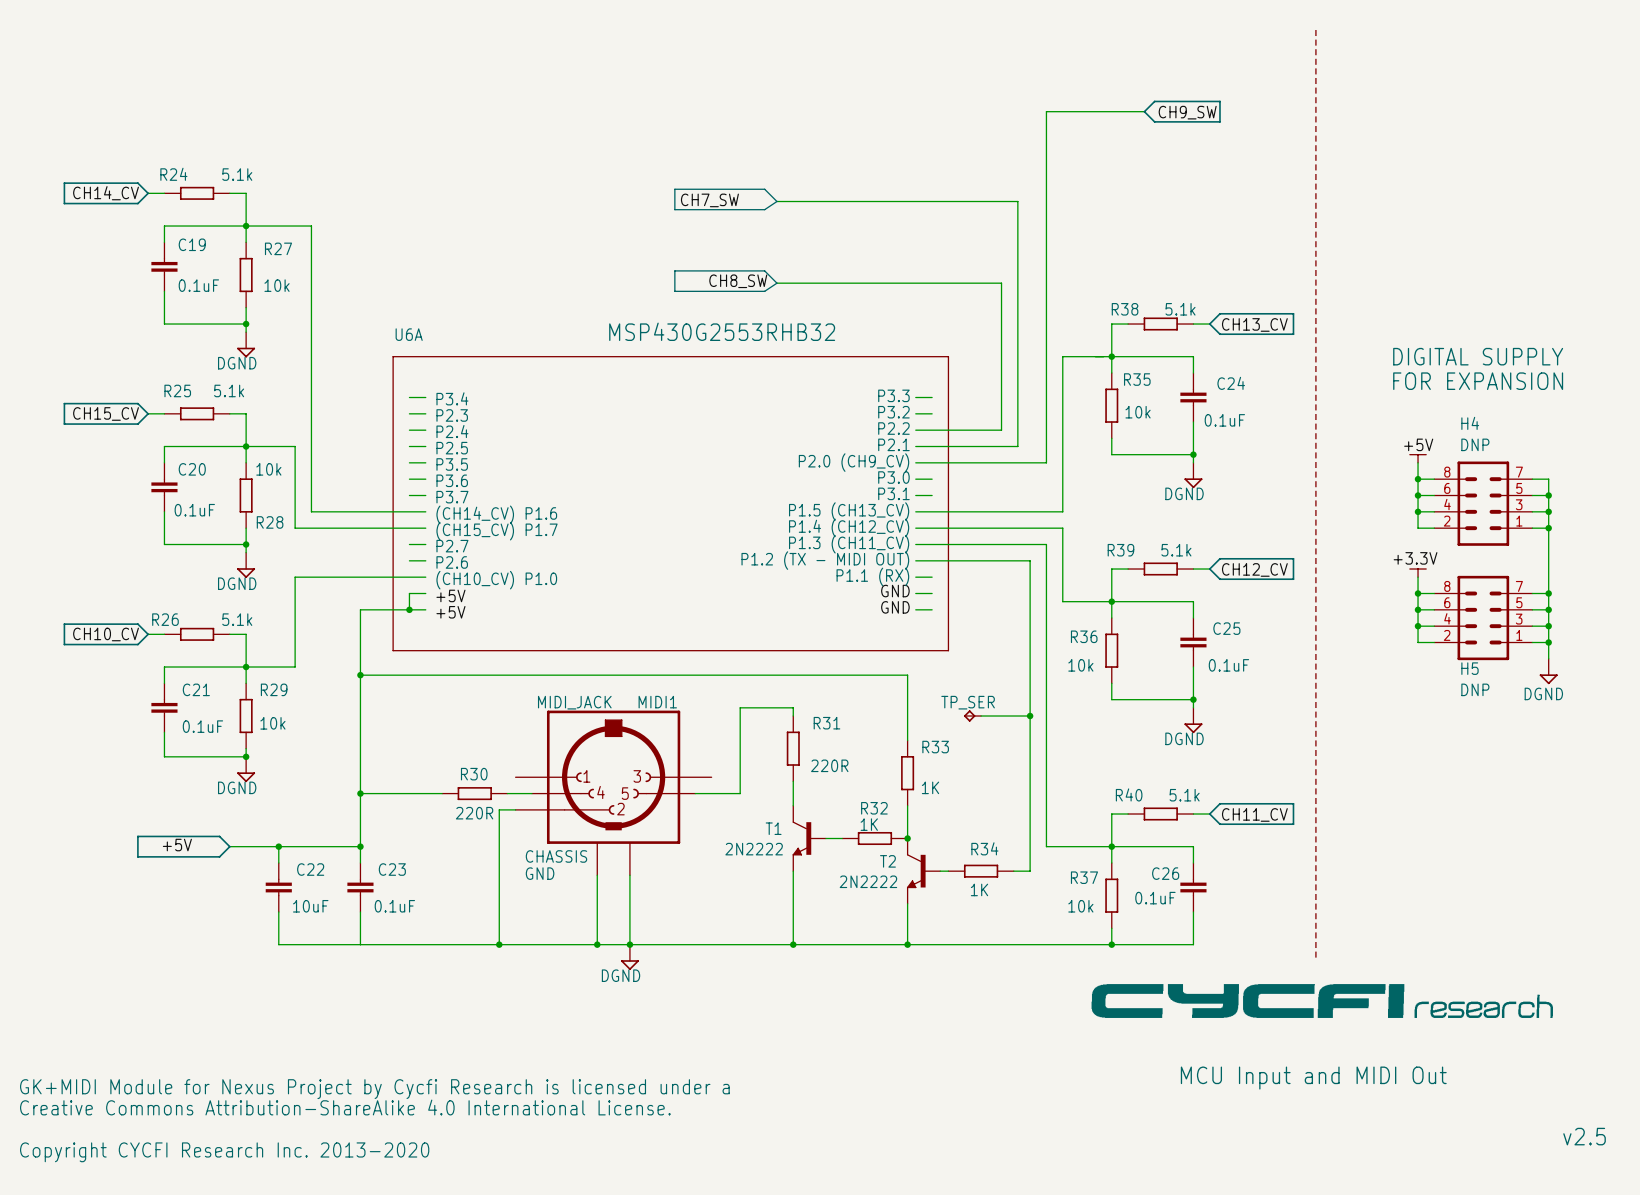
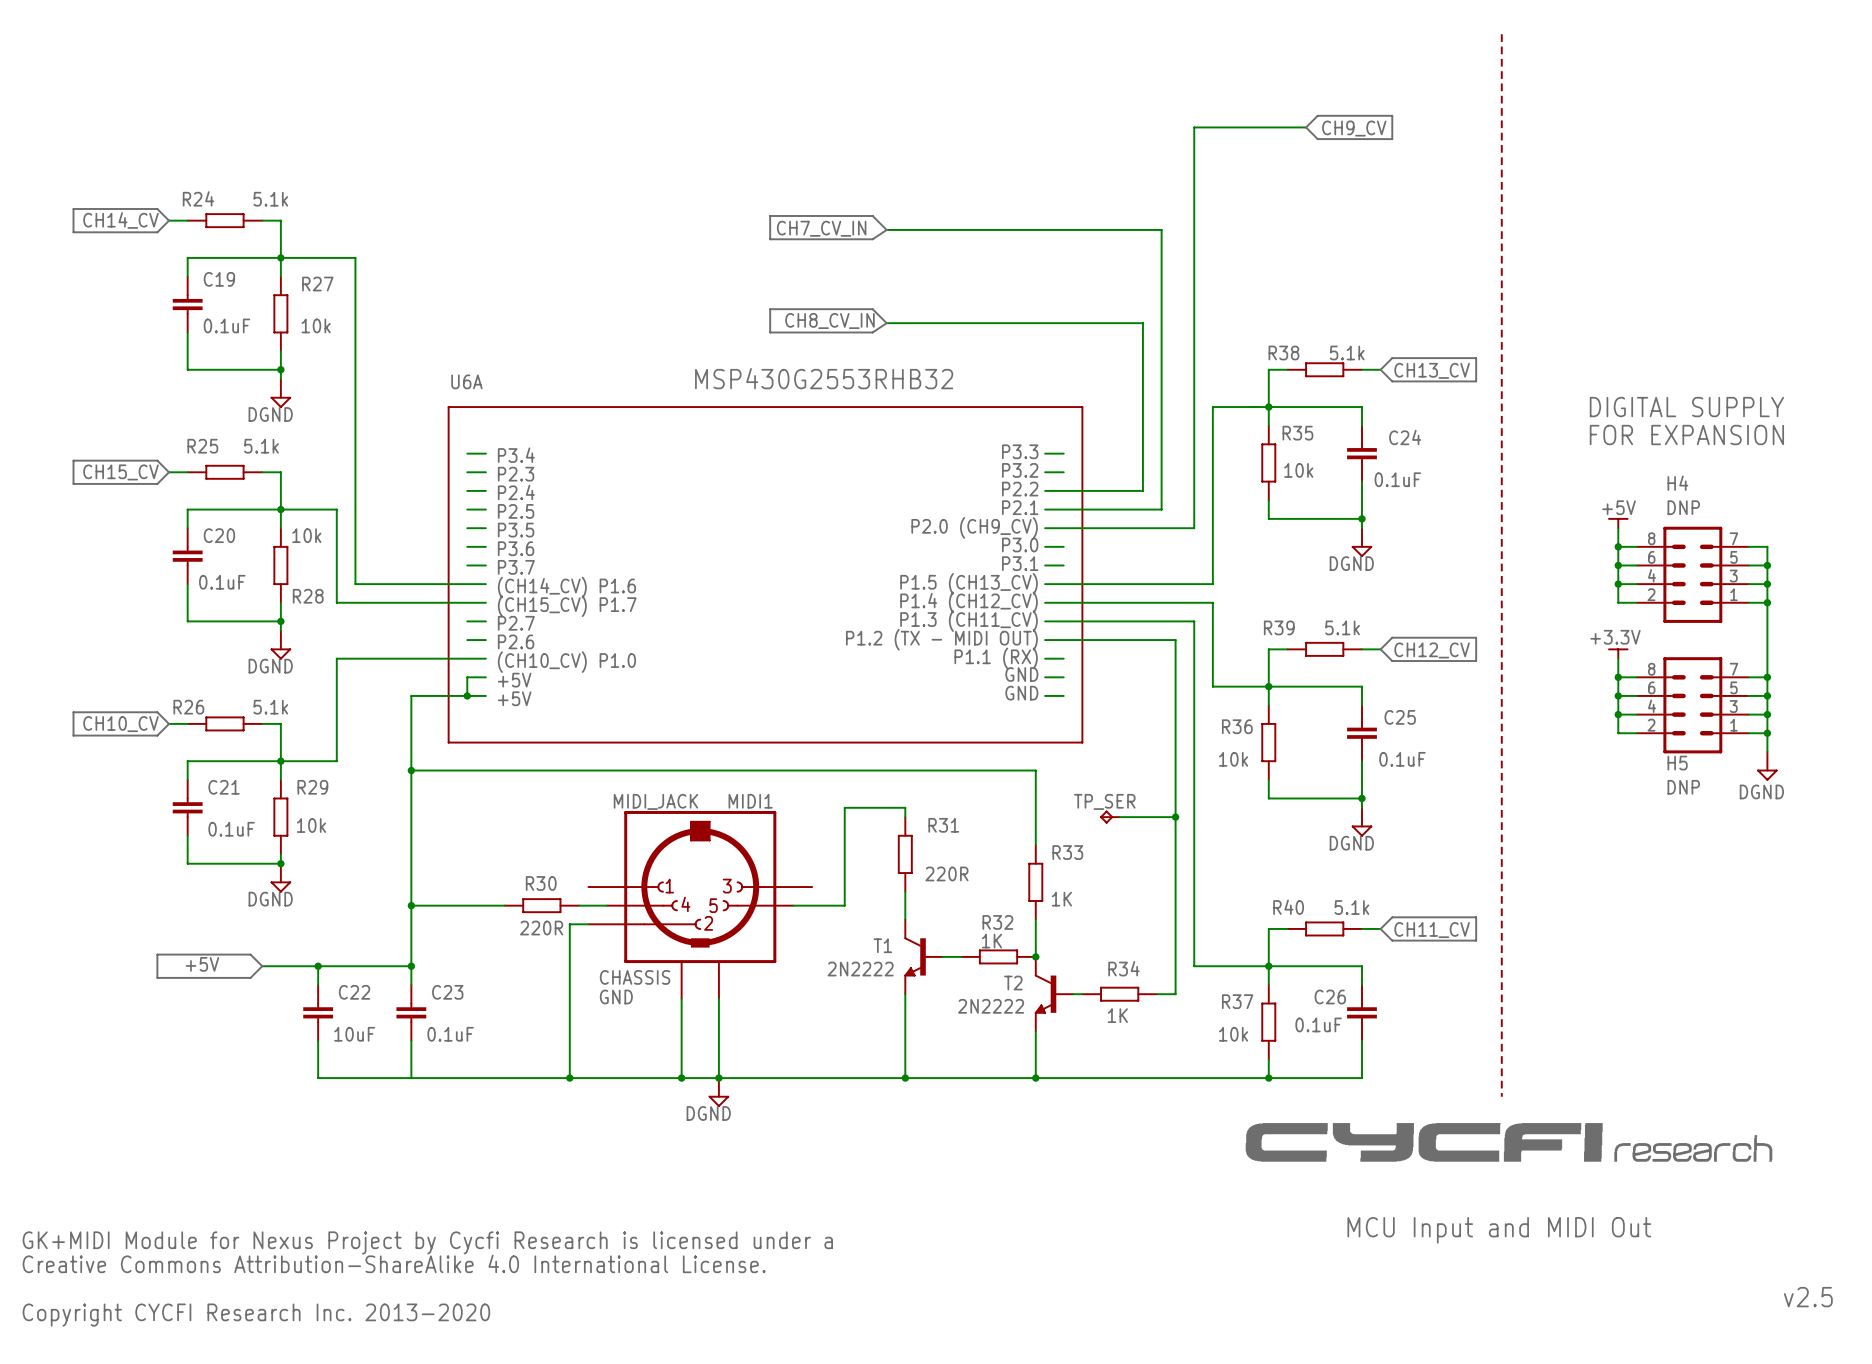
label: CH9_SW (1187, 112) -> CH9_CV (1354, 128)
label: CH7_SW (709, 200) -> CH7_CV_IN (821, 228)
label: CH8_SW (738, 281) -> CH8_CV_IN (829, 320)

